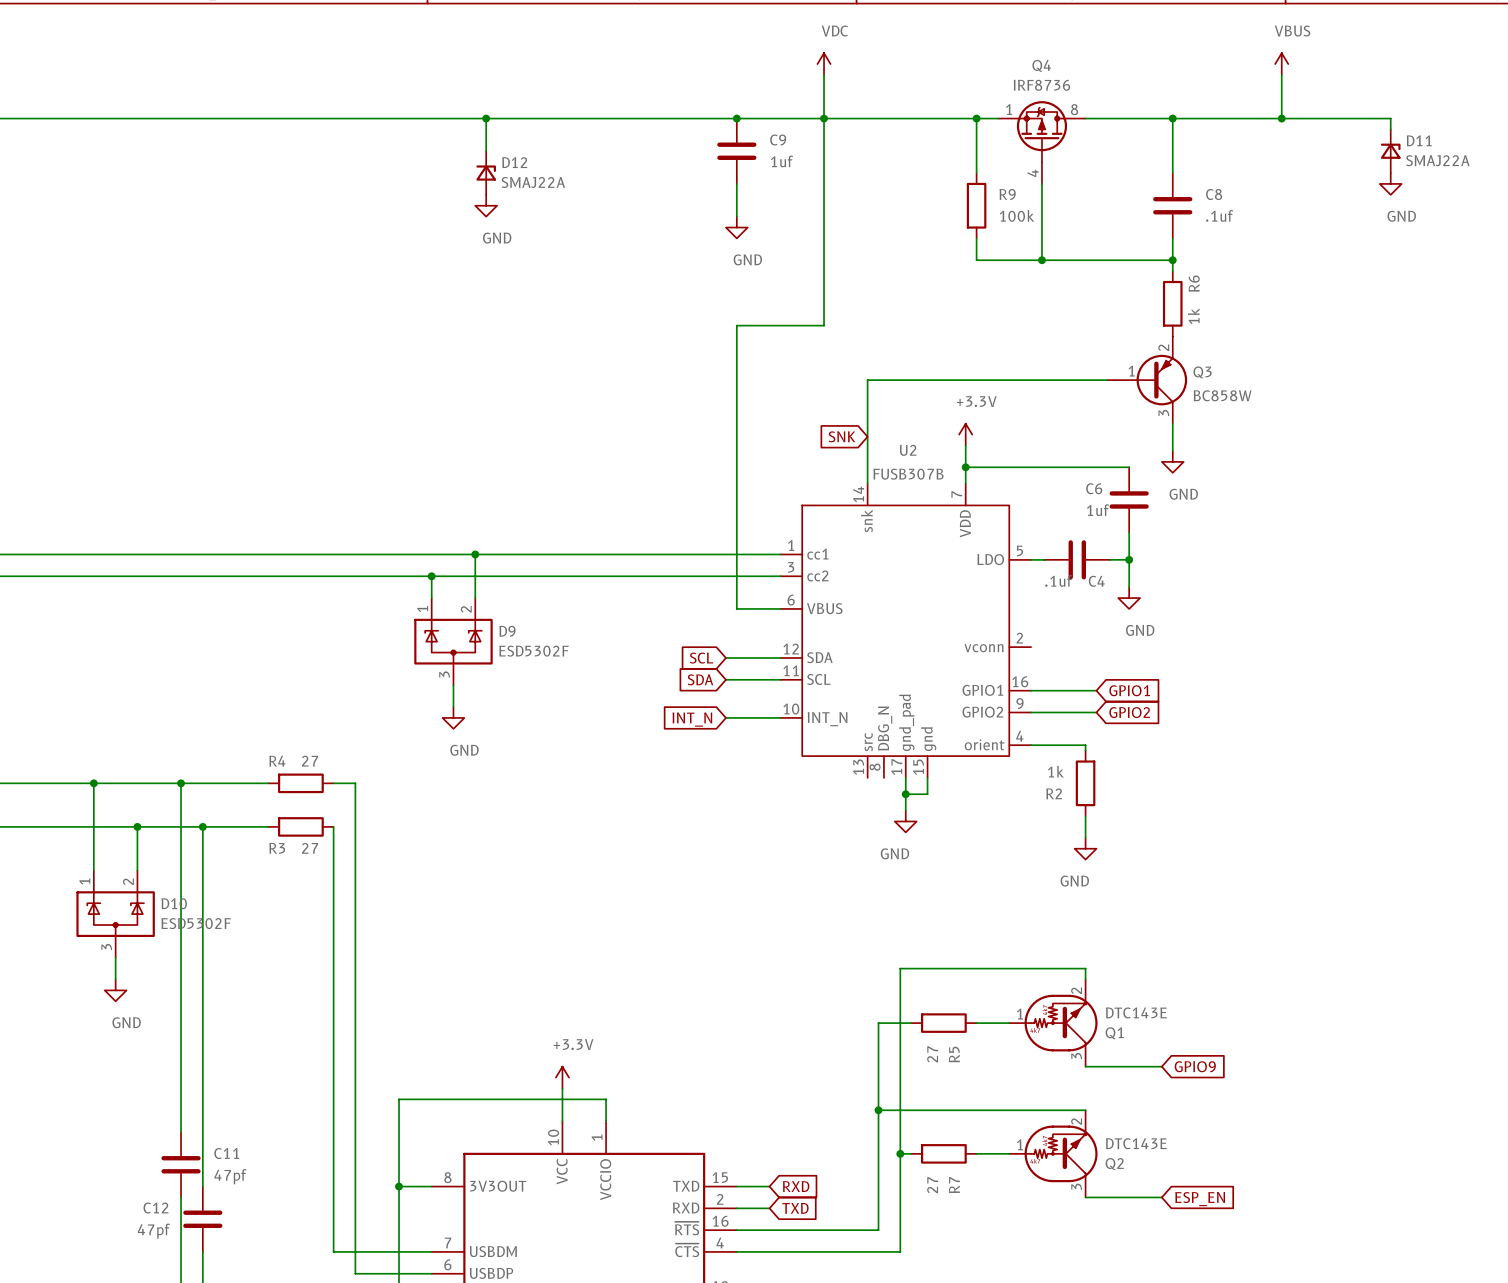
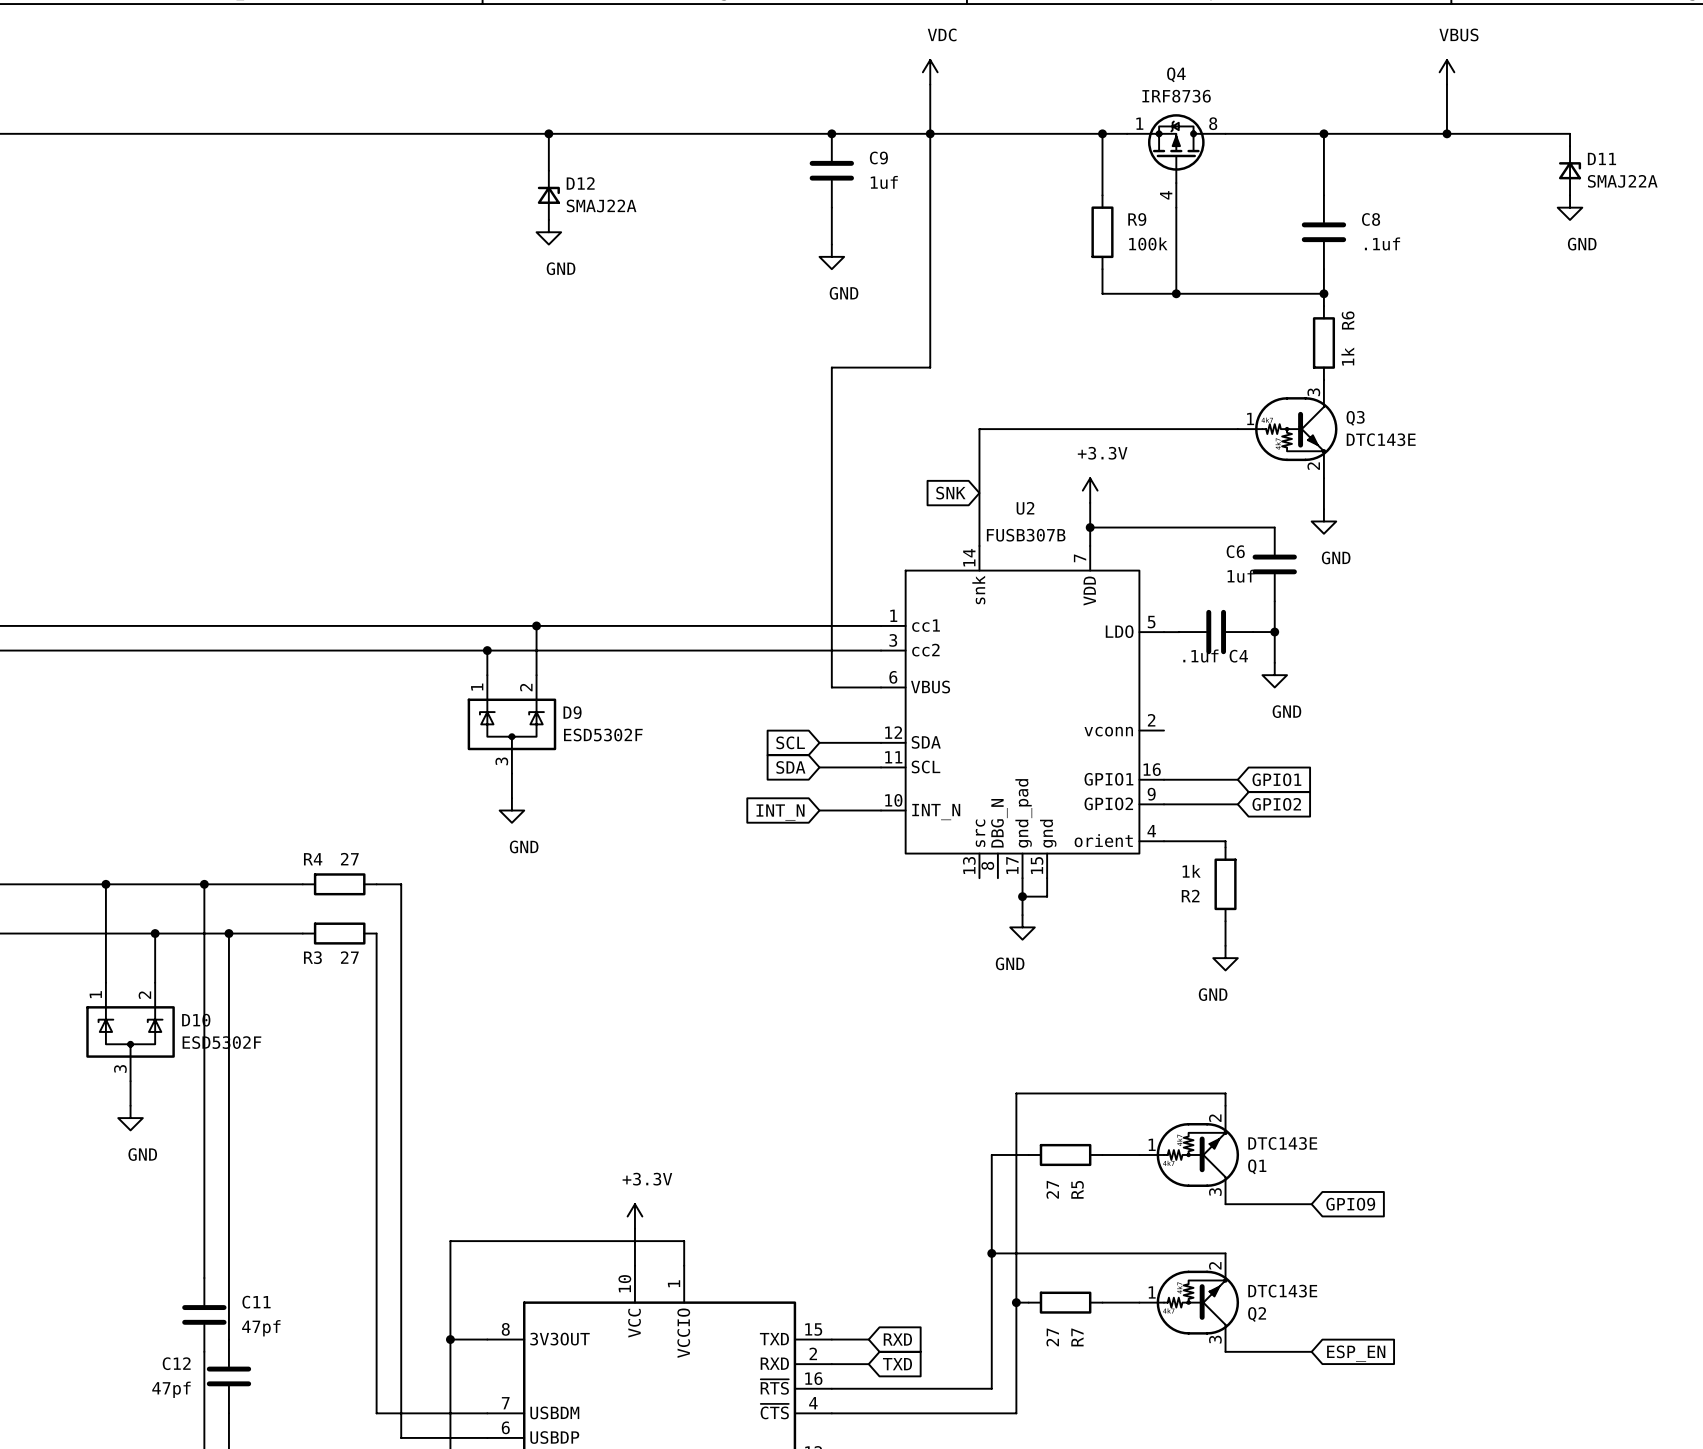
Q3 symbol: [1107, 336, 1188, 424] -> [1237, 379, 1338, 479]
Q3 value: BC858W (1222, 395) -> DTC143E (1381, 439)

